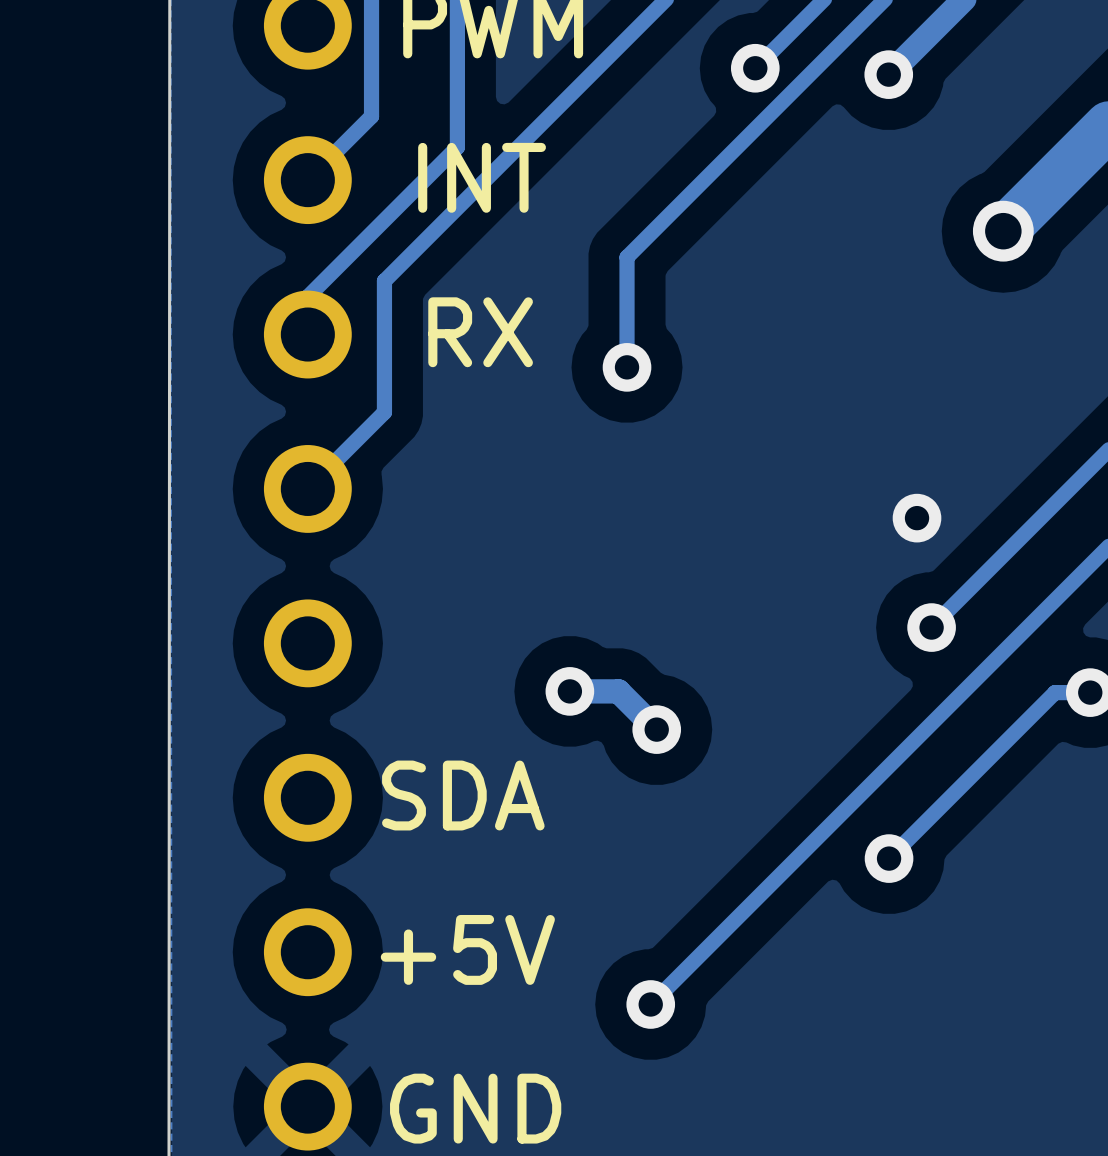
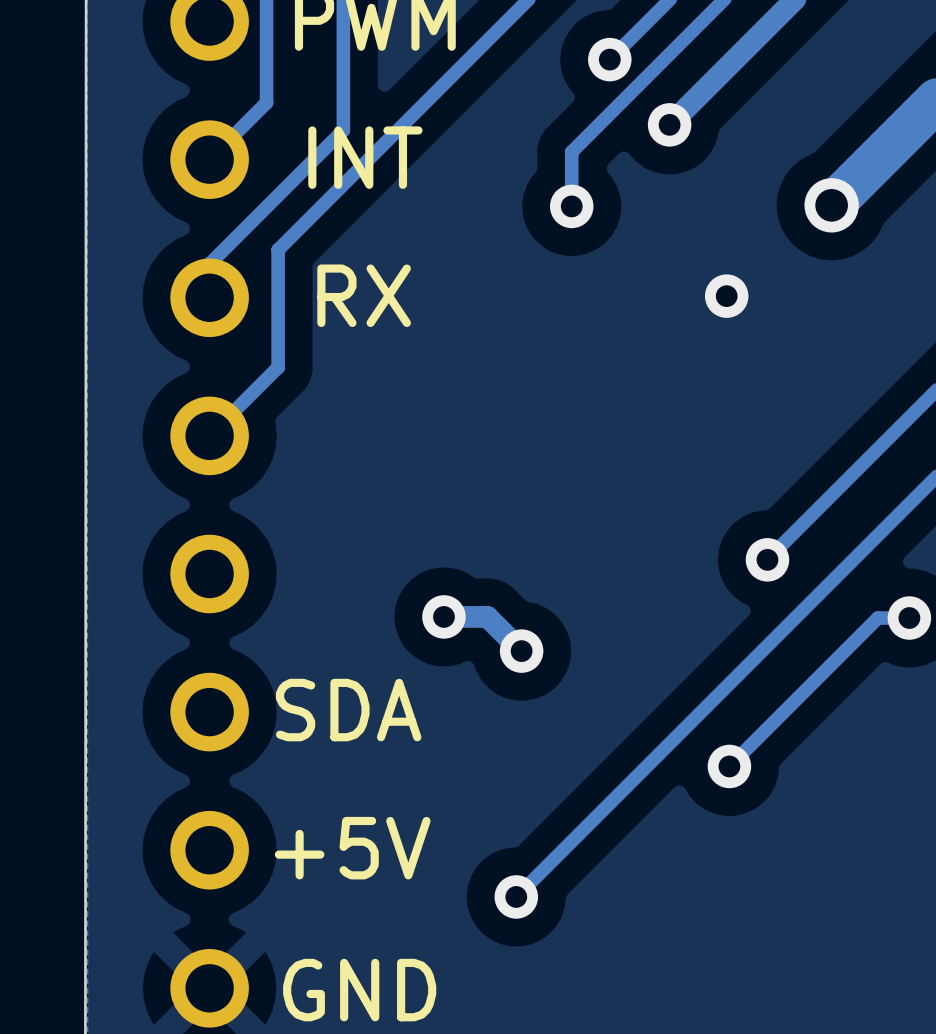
track: none -> (729, 65) (669, 124)
via position: (888, 74) -> (669, 124)
track: (712, 171) (627, 257) (627, 367) -> (571, 152) (571, 206)
via: none -> (571, 206)
via: none -> (726, 296)
via: (627, 367) -> none
via: (917, 518) -> none

